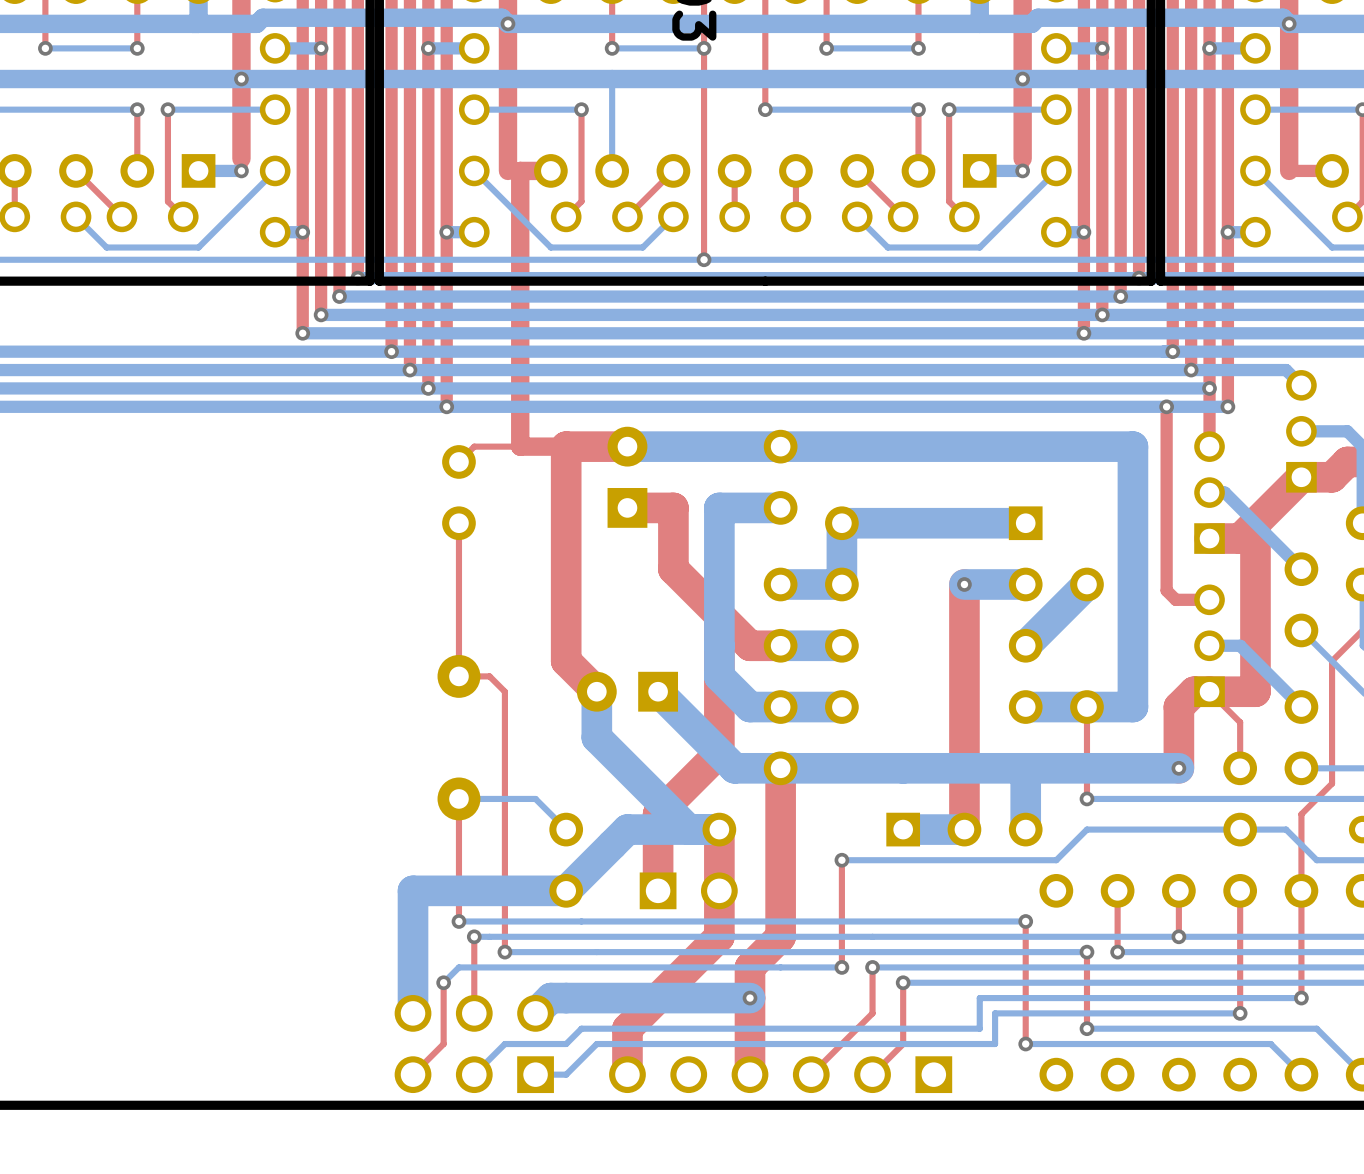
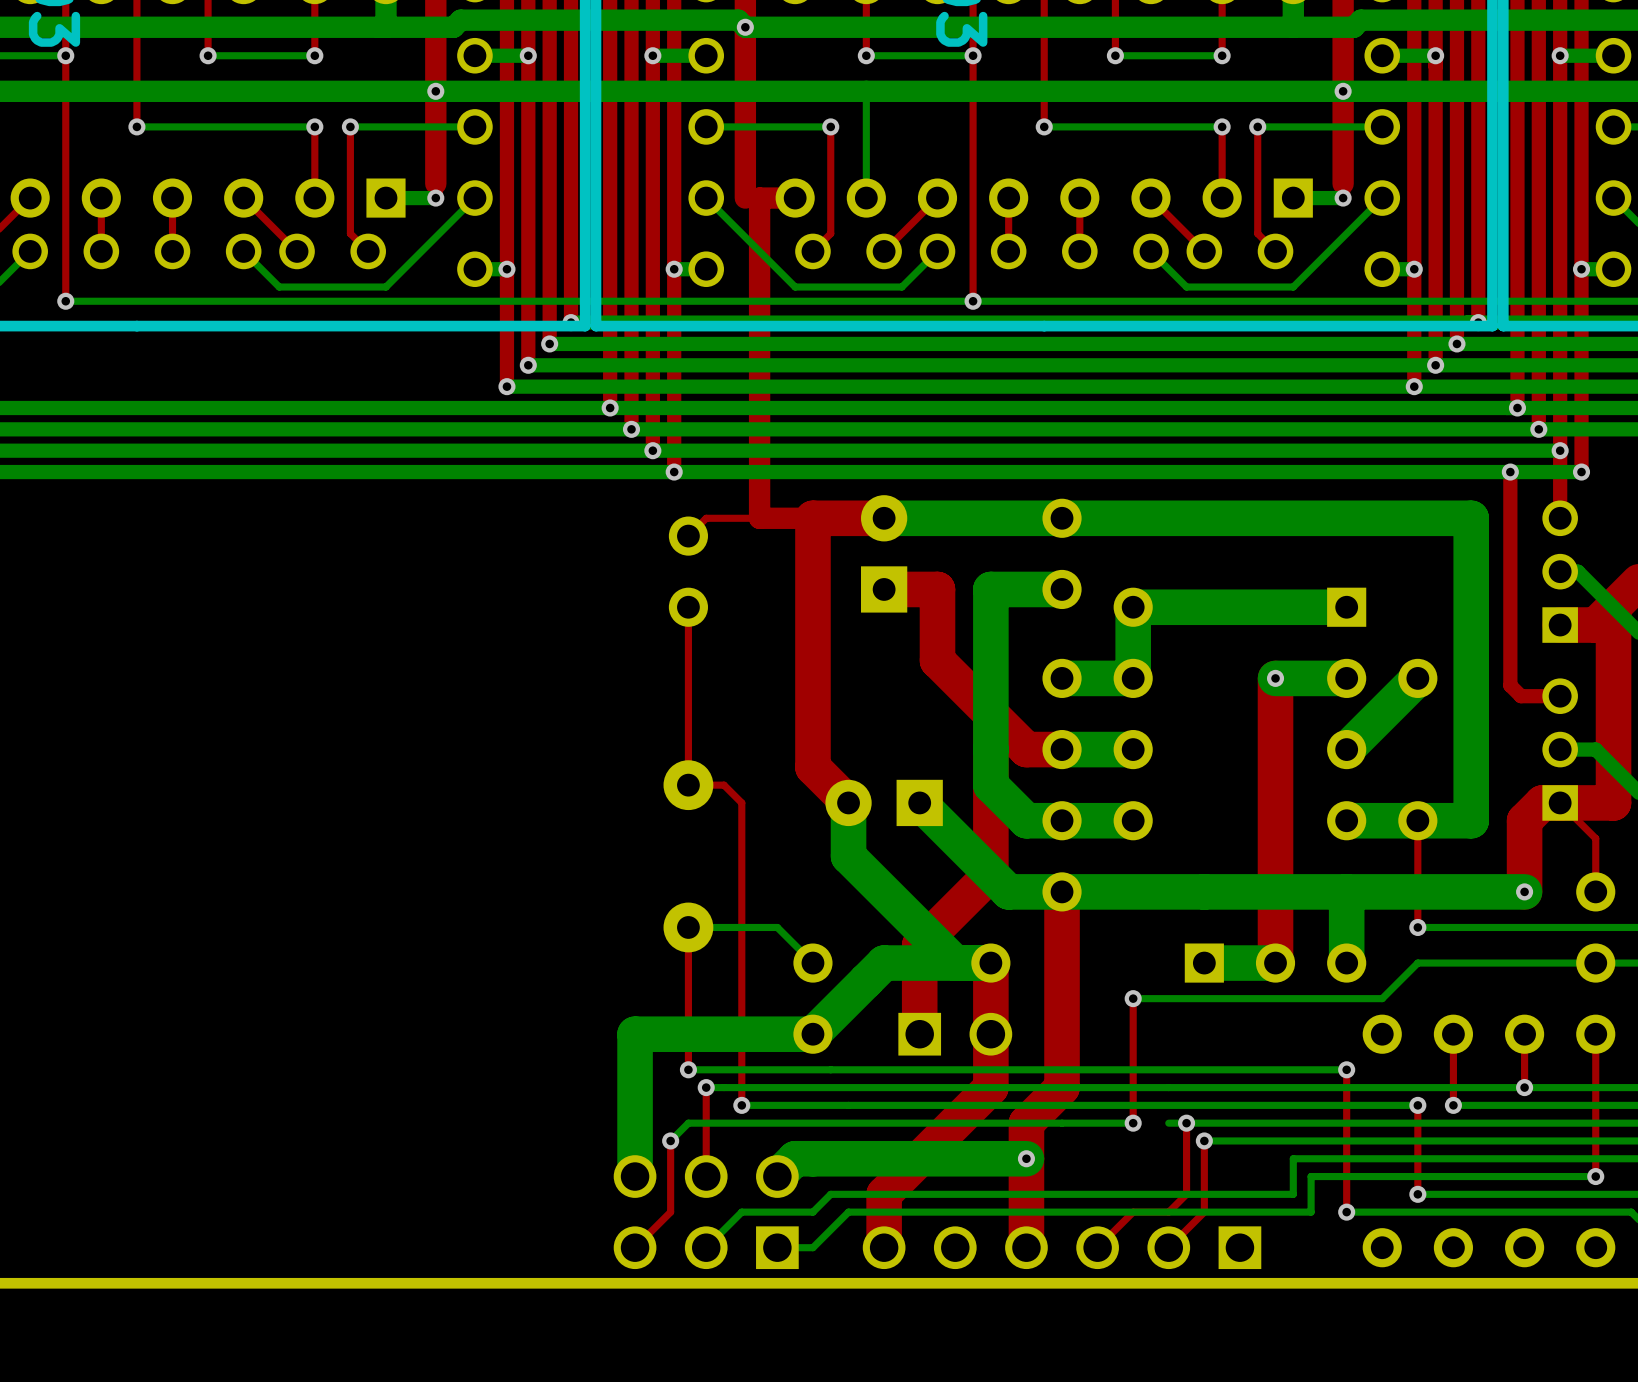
top track: (872, 967) (872, 1013) (841, 1044) -> (1186, 1123) (1186, 1194) (1168, 1212) (1133, 1212)
via position: (872, 967) -> (1186, 1123)

